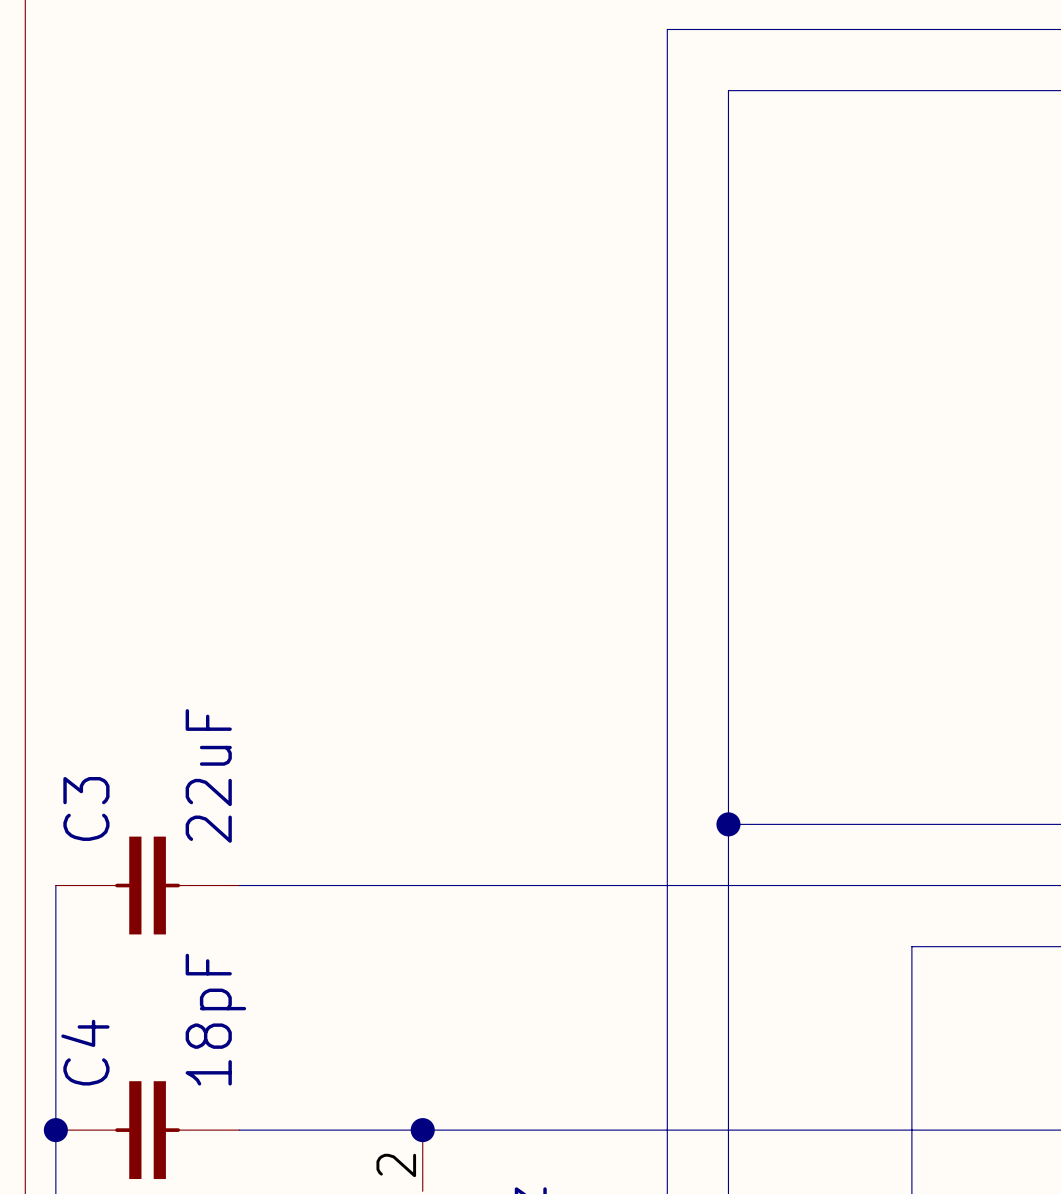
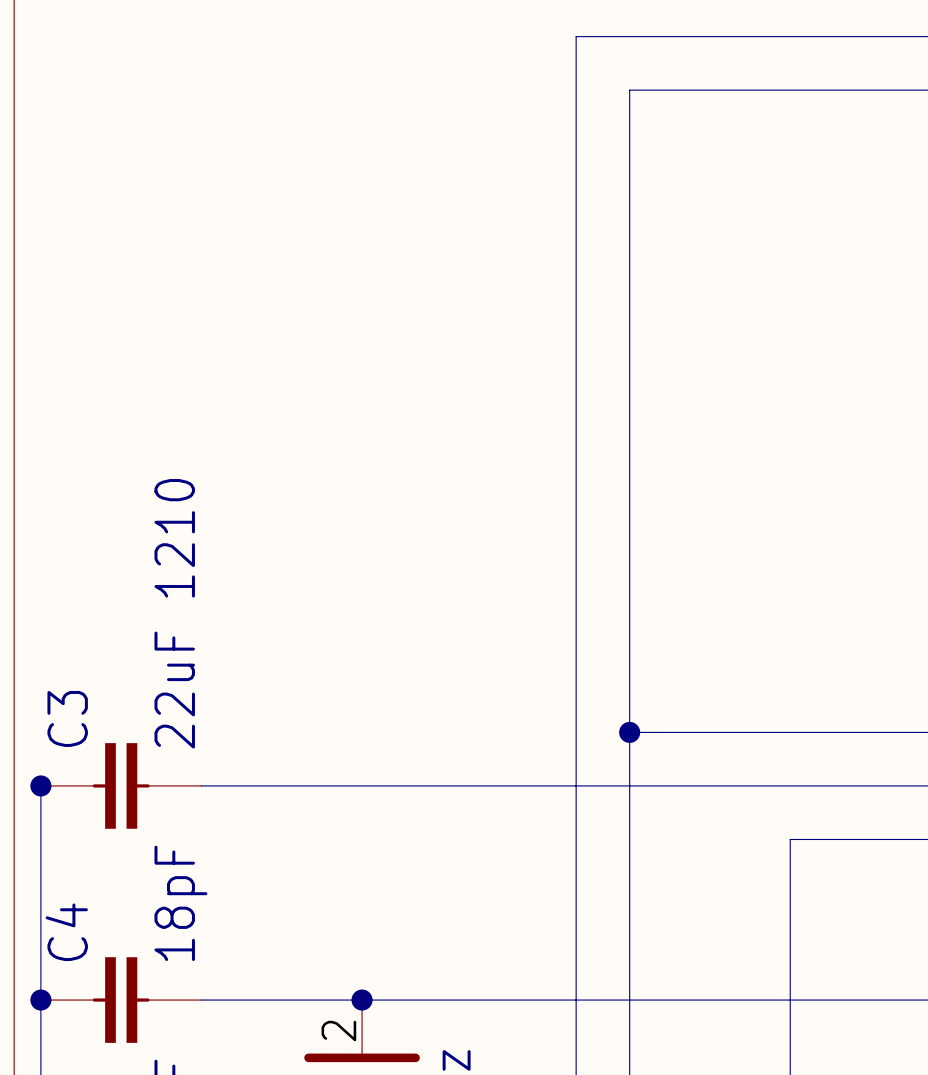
C3 value: 22uF (208, 775) -> 22uF 1210 (174, 613)
junction: none -> (40, 785)

